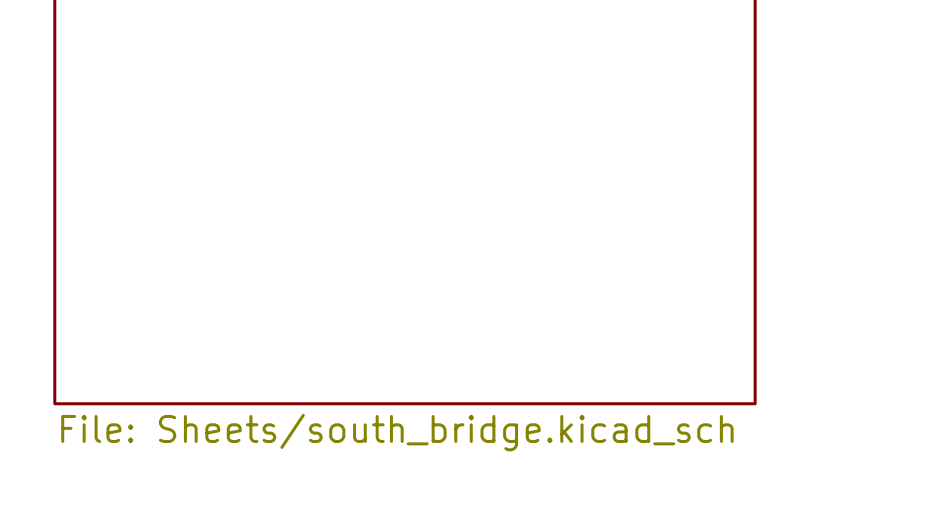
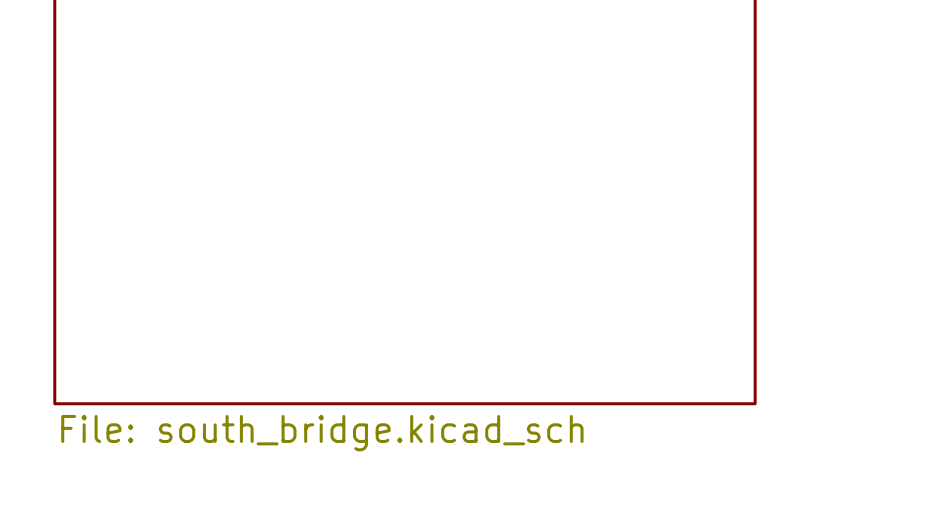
sheet value: File: Sheets/south_bridge.kicad_sch (397, 432) -> File: south_bridge.kicad_sch (322, 433)

